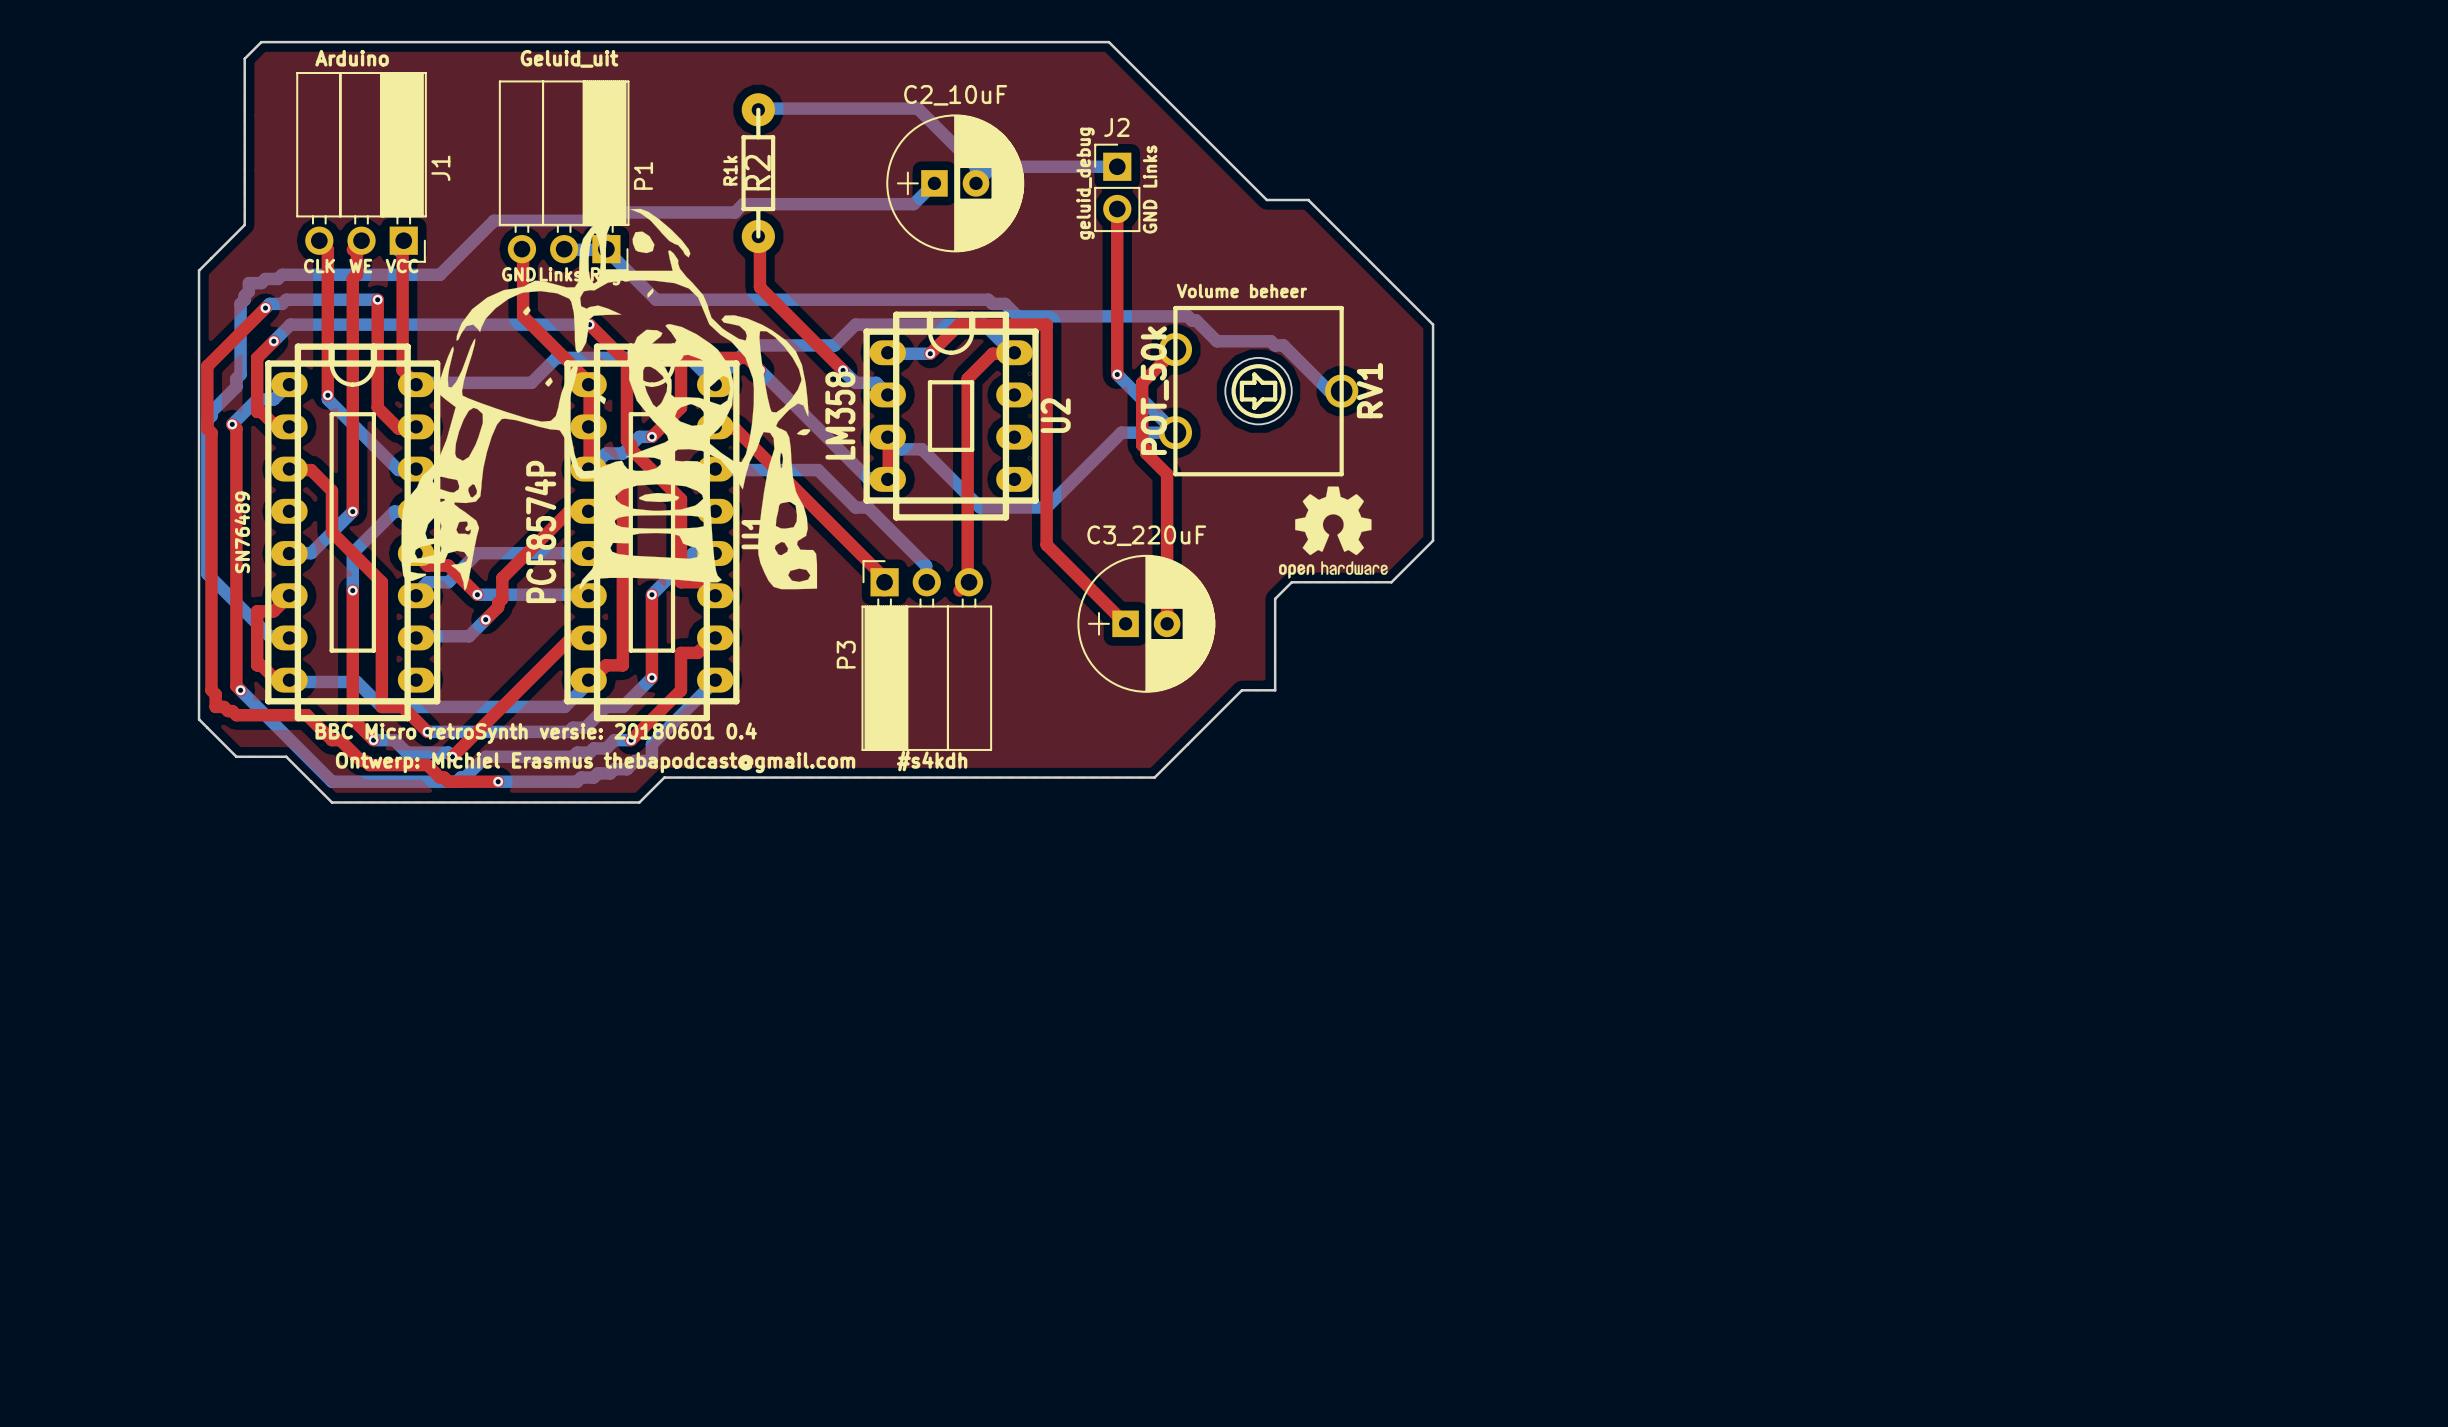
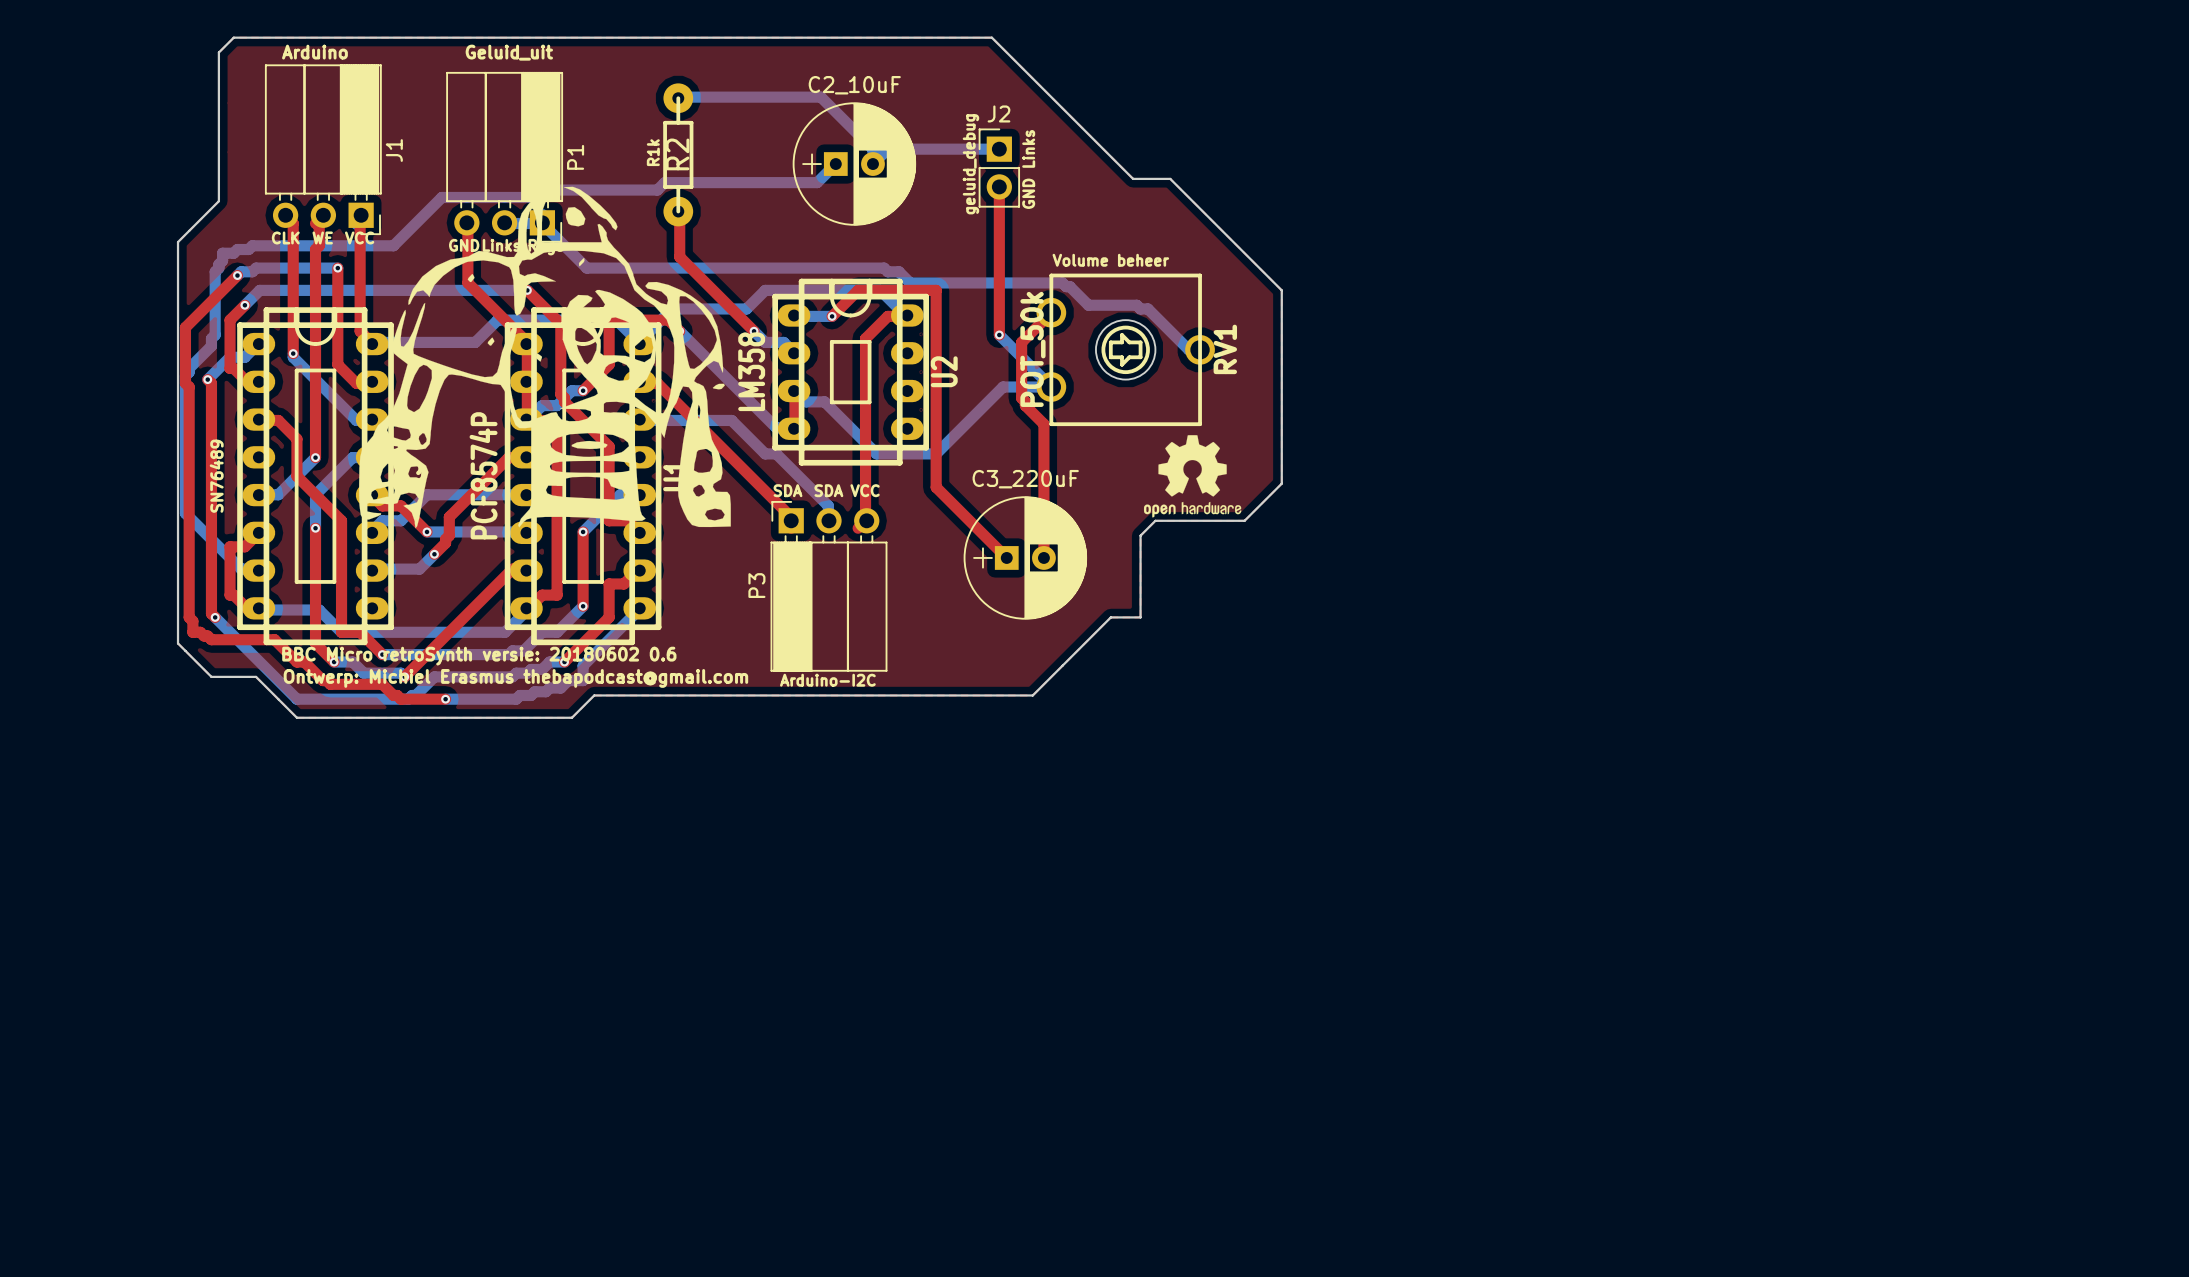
text: none -> SDA (788, 490)
text: none -> SDA (828, 490)
text: none -> VCC (865, 490)
text: BBC Micro retroSynth versie: 20180601 0.4 (536, 733) -> BBC Micro retroSynth versie: 20180602 0.6 (479, 656)
text: none -> Arduino-I2C (827, 680)
text: Ontwerp: Michiel Erasmus thebapodcast@gmail.com #s4kdh (651, 762) -> Ontwerp: Michiel Erasmus thebapodcast@gmail.com (515, 678)

